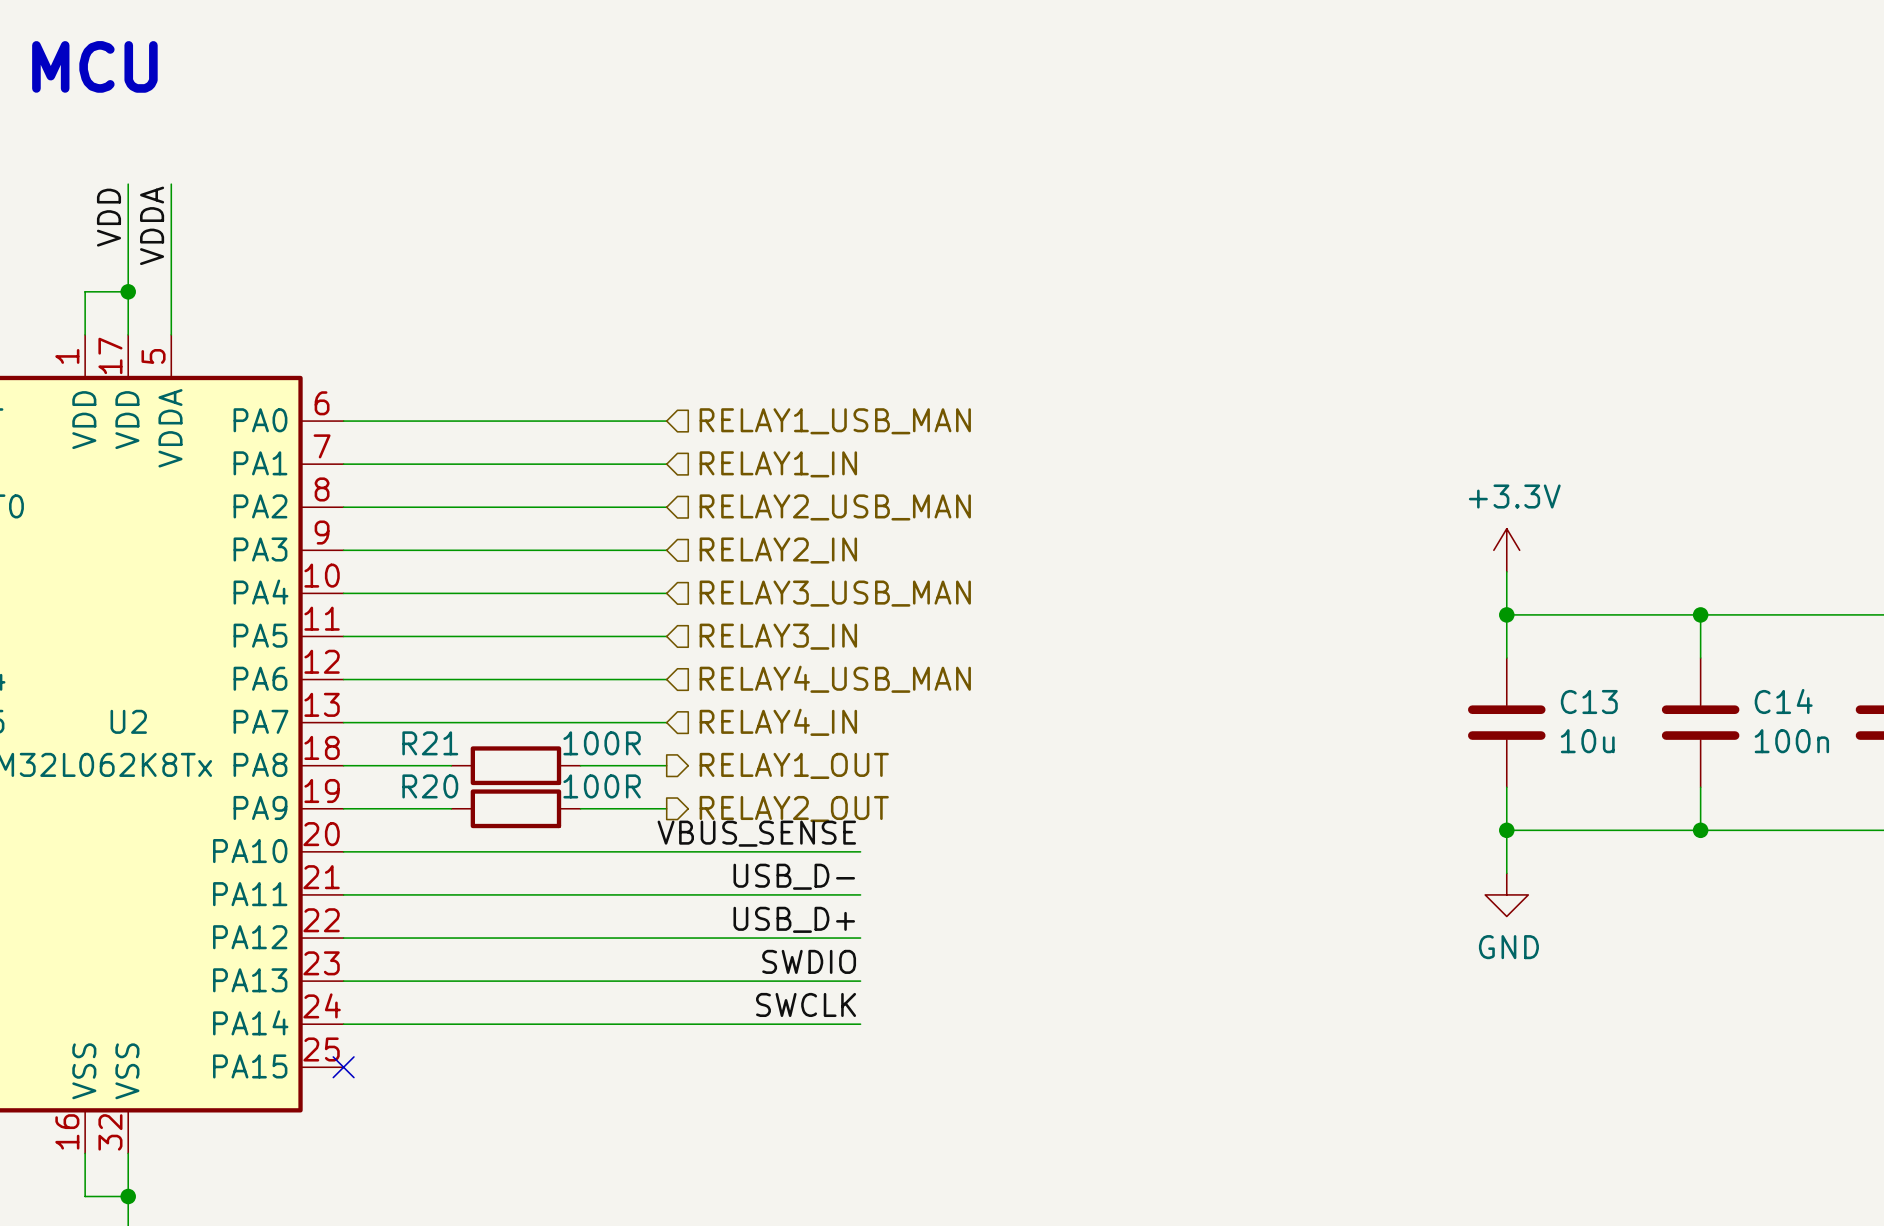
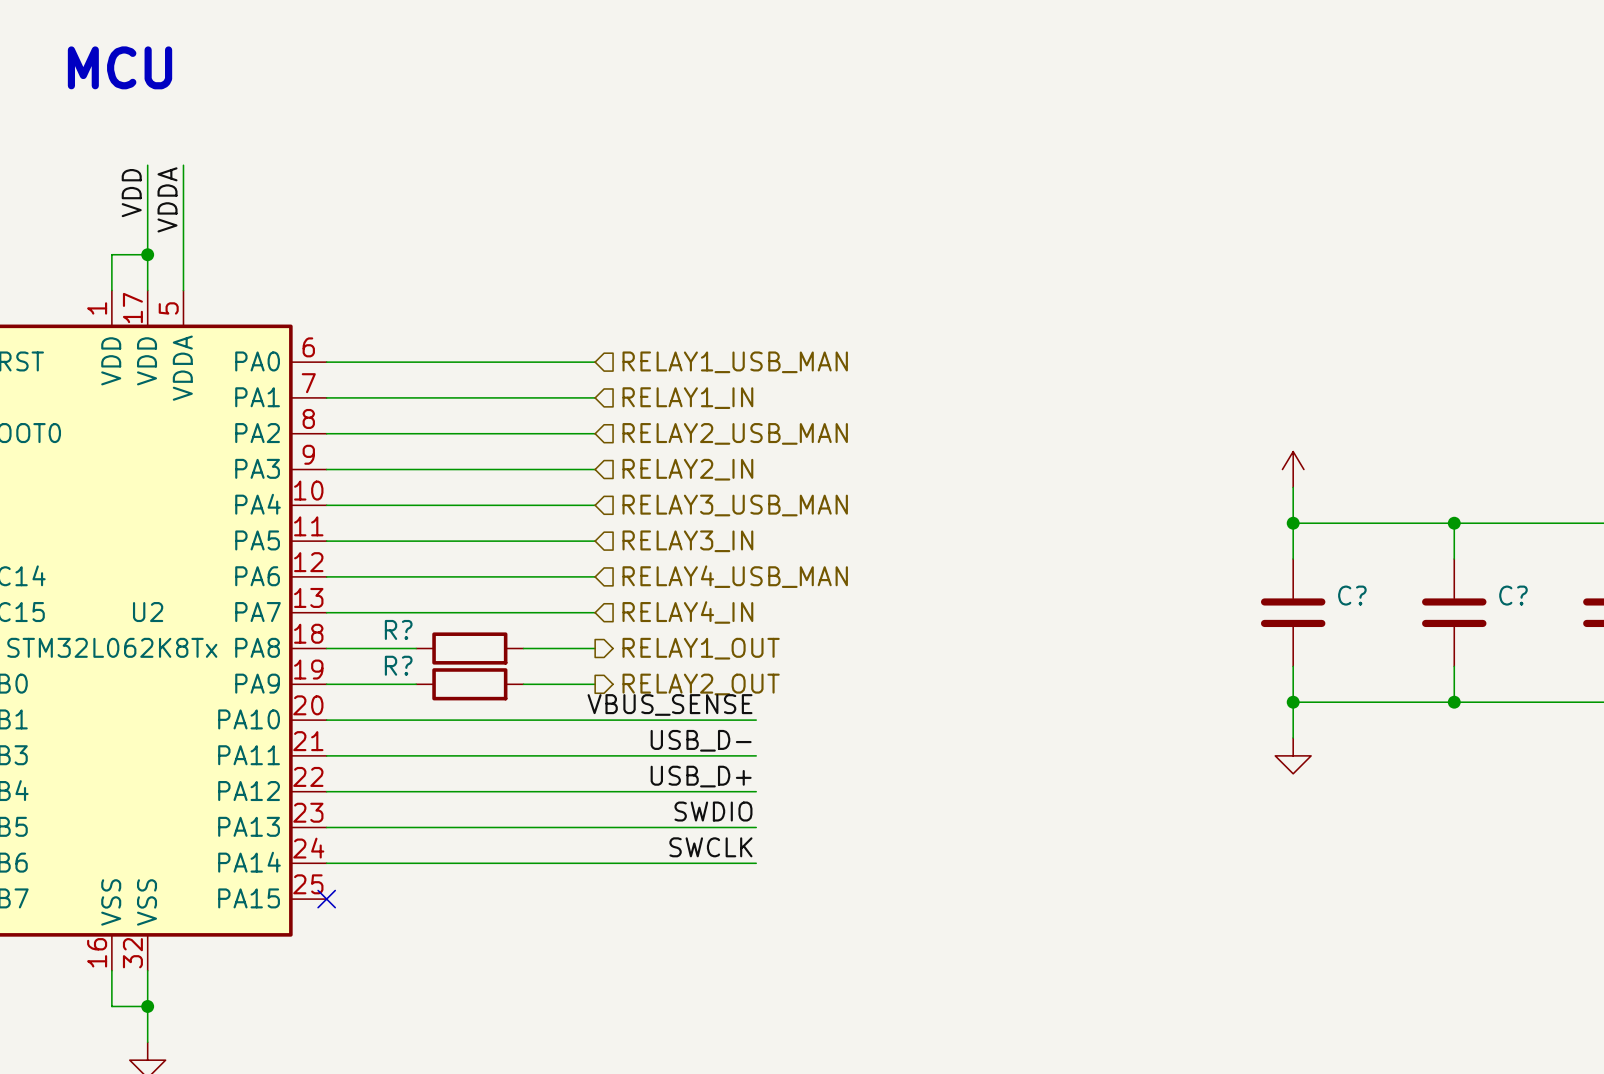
power symbol text: +3.3V (1514, 496) -> none
C14 name: C14 (1783, 701) -> C? (1513, 595)
C13 name: C13 (1589, 702) -> C? (1352, 595)
C13 value: 10u (1587, 741) -> none
C14 value: 100n (1791, 741) -> none
R21 name: R21 (430, 743) -> R? (398, 629)
R21 value: 100R (602, 743) -> none
R20 name: R20 (430, 786) -> R? (398, 665)
R20 value: 100R (602, 786) -> none
power symbol text: GND (1508, 947) -> none

